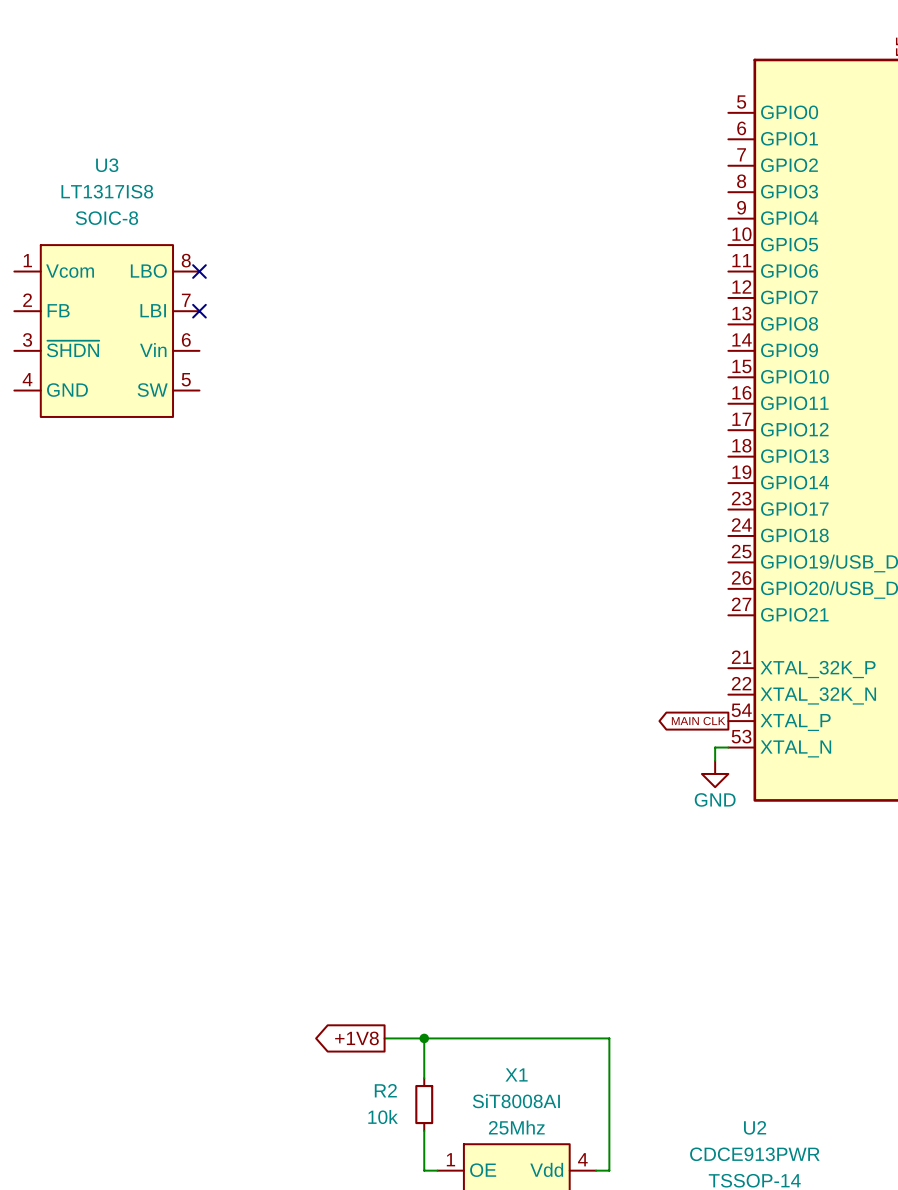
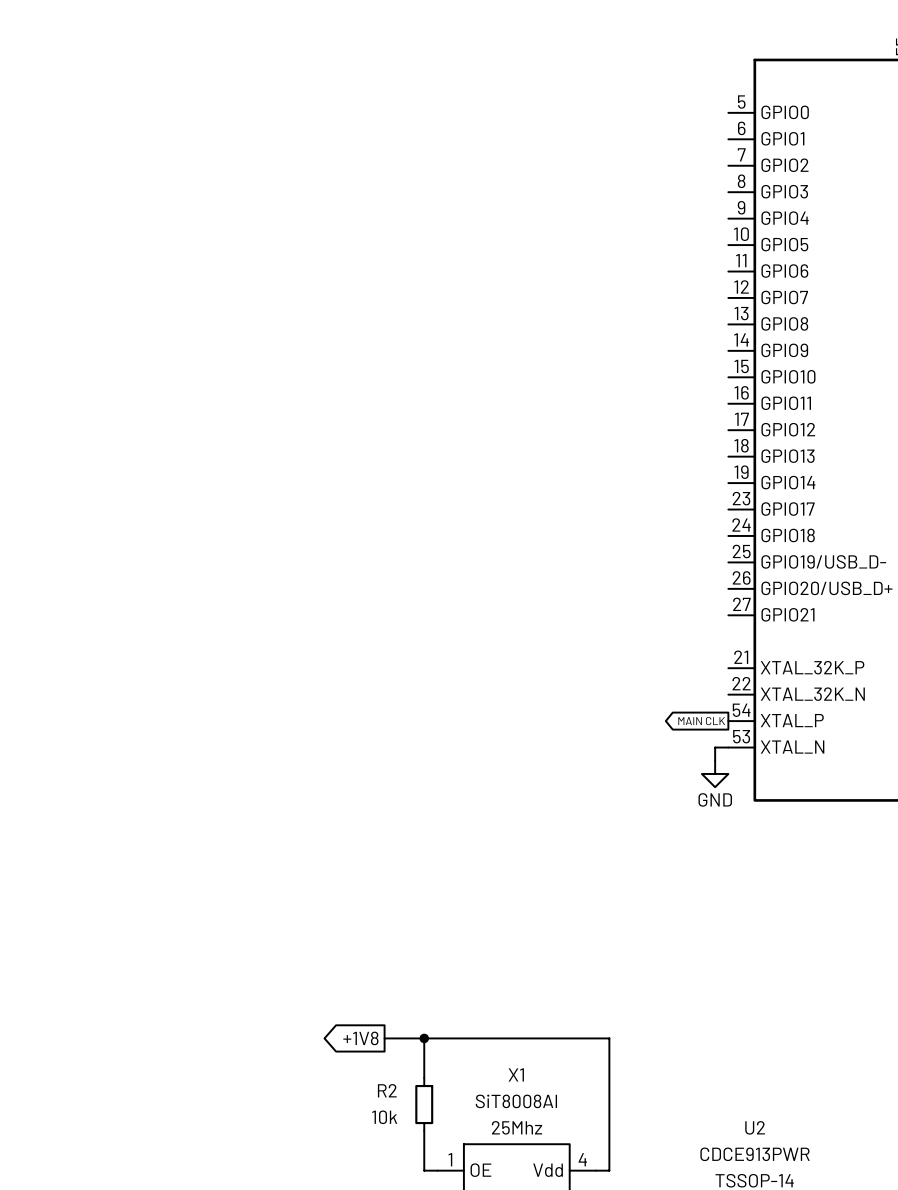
no-connect mark: (199, 271) -> none
no-connect mark: (199, 311) -> none
U3: LT1317IS8 (106, 331) -> none

